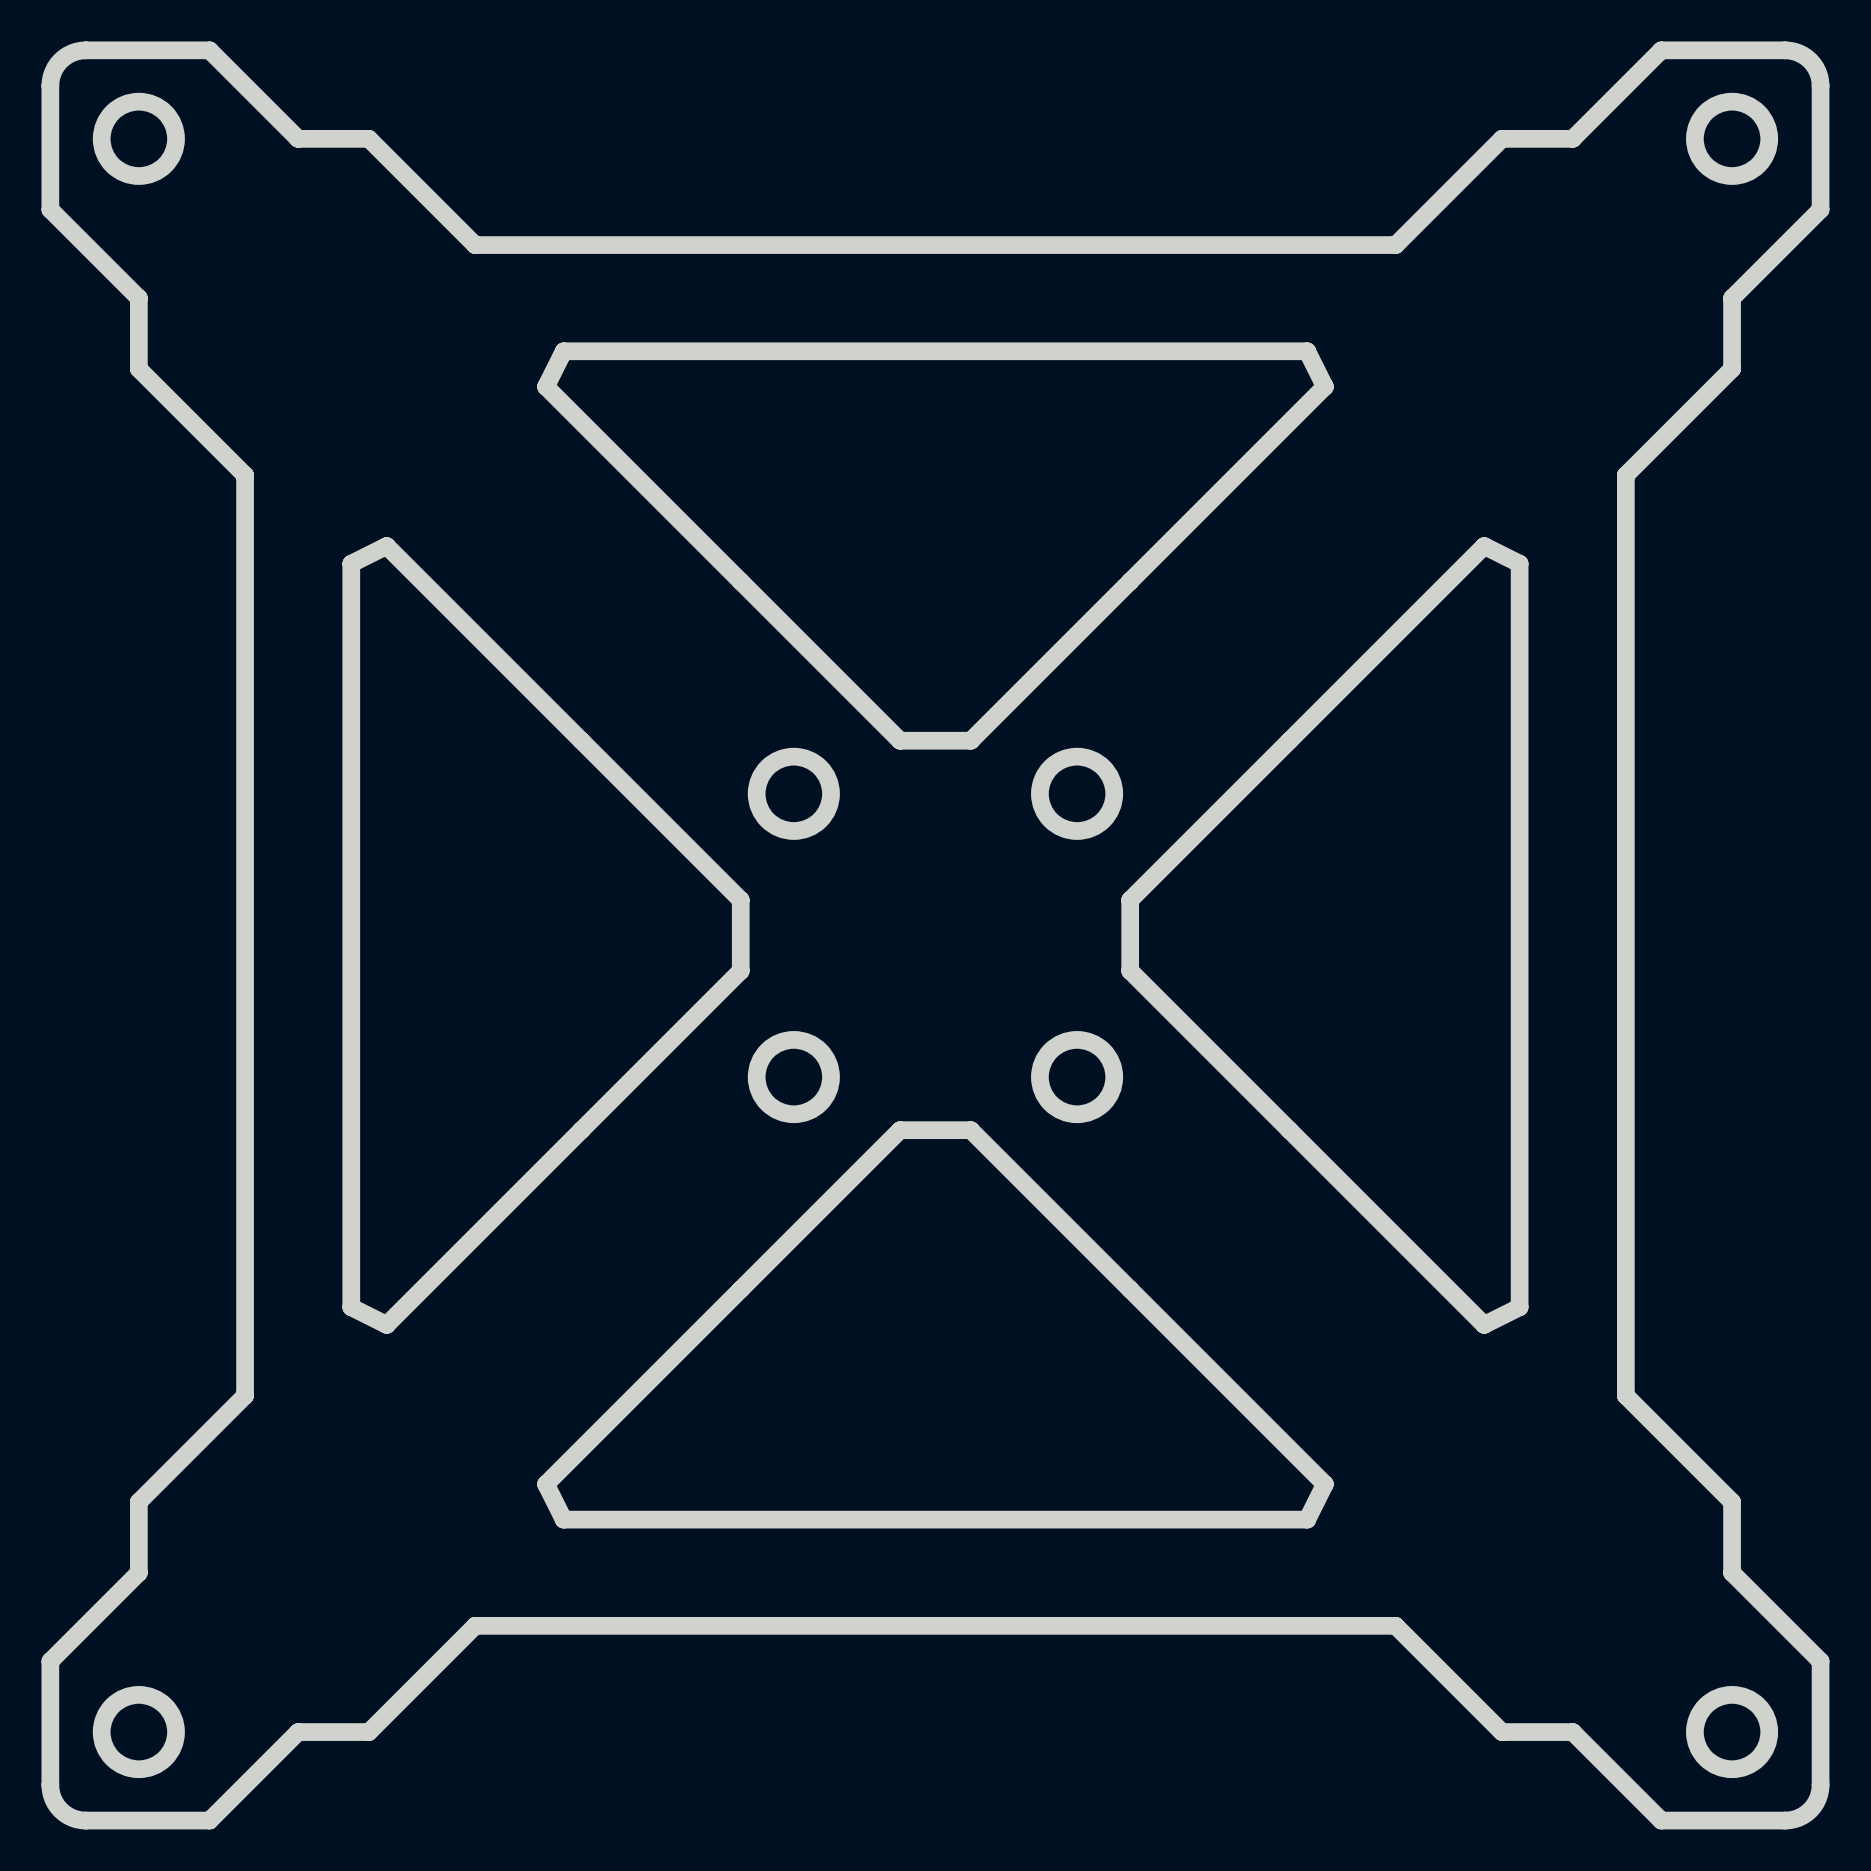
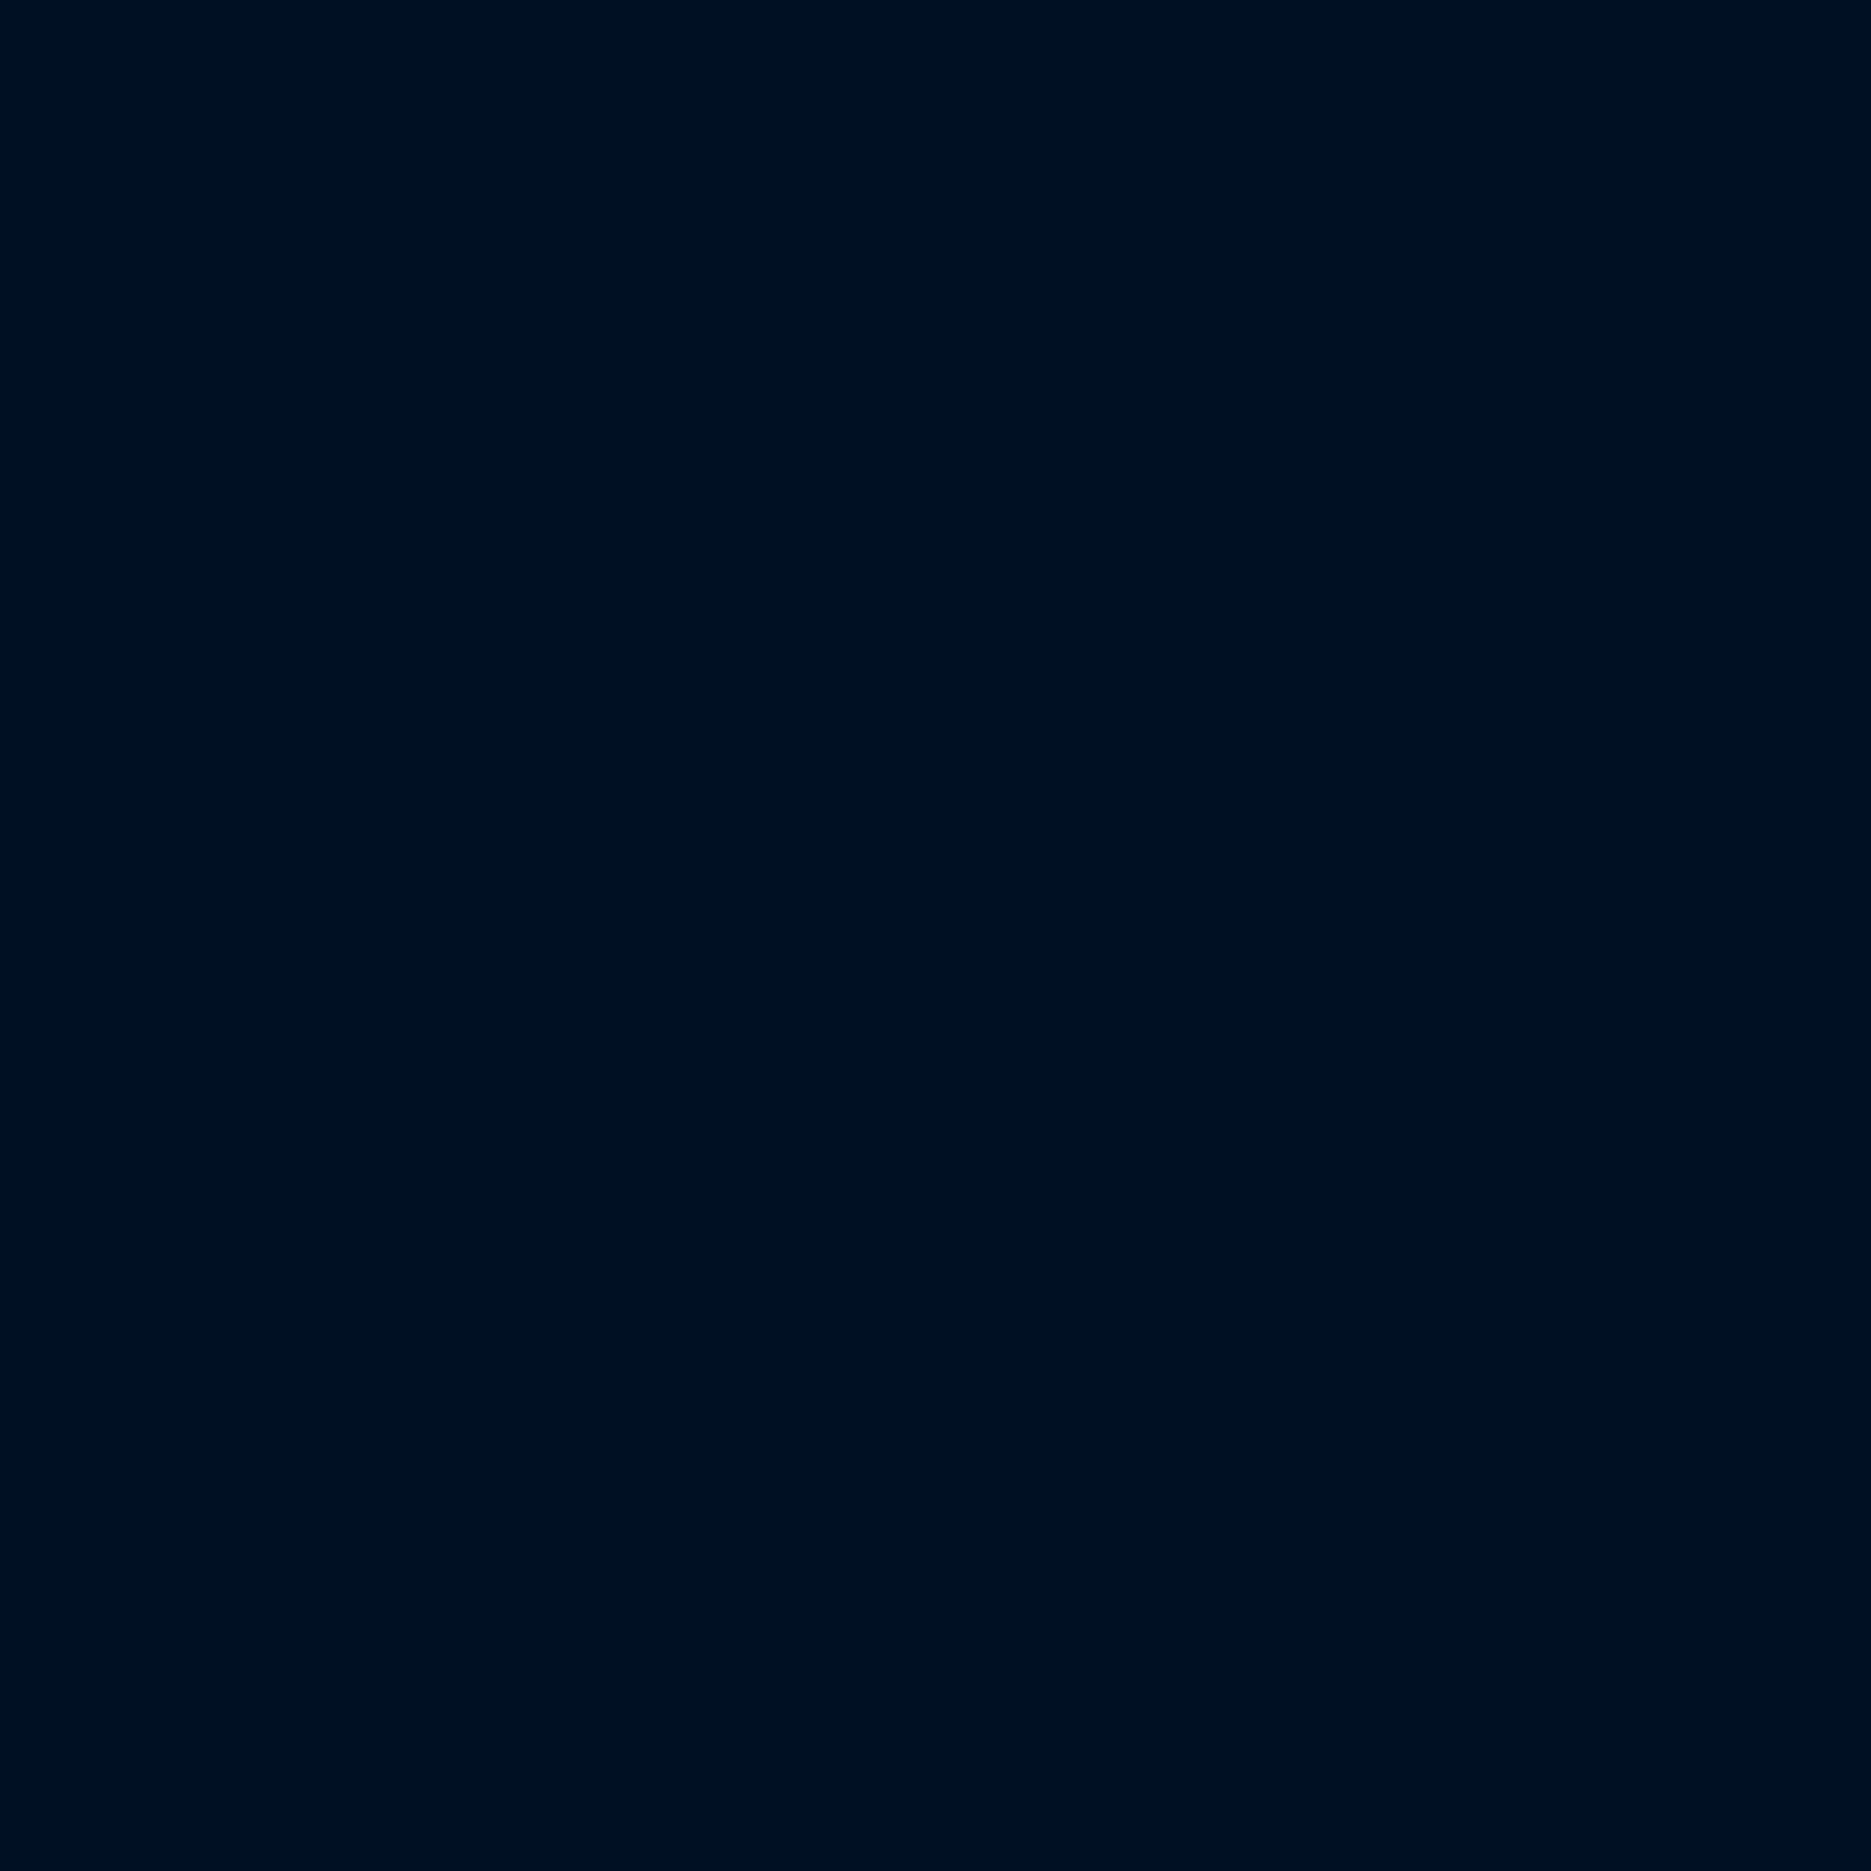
board edge: (1785, 50) (1661, 50) (1572, 138) (1501, 138) (1395, 245) (475, 245) (368, 138) (298, 138) (209, 50) (81, 50) (68, 55) (60, 60) (53, 72) (50, 81) (50, 209) (138, 298) (138, 368) (245, 475) (245, 1395) (138, 1501) (138, 1572) (50, 1661) (50, 1789) (53, 1798) (60, 1810) (72, 1817) (81, 1820) (209, 1820) (298, 1732) (368, 1732) (475, 1625) (1395, 1625) (1501, 1732) (1572, 1732) (1661, 1820) (1789, 1820) (1798, 1817) (1810, 1810) (1815, 1802) (1820, 1789) (1820, 1661) (1732, 1572) (1732, 1501) (1625, 1395) (1625, 475) (1732, 368) (1732, 298) (1820, 209) (1819, 76) (1813, 64) (1806, 57) (1794, 51) (1785, 50) -> none
round board edge: [92, 92, 185, 185] -> none
round board edge: [1686, 92, 1779, 185] -> none
board edge: (1307, 351) (1324, 386) (970, 740) (900, 740) (546, 386) (563, 351) (1307, 351) -> none
board edge: (386, 546) (351, 563) (351, 1307) (386, 1324) (740, 970) (740, 900) (386, 546) -> none
board edge: (1484, 546) (1519, 563) (1519, 1307) (1484, 1324) (1130, 970) (1130, 900) (1484, 546) -> none
round board edge: [747, 747, 840, 840] -> none
round board edge: [1031, 747, 1124, 840] -> none
round board edge: [747, 1031, 840, 1124] -> none
round board edge: [1031, 1031, 1124, 1124] -> none
board edge: (970, 1130) (1324, 1484) (1307, 1519) (563, 1519) (546, 1484) (900, 1130) (970, 1130) -> none
round board edge: [92, 1686, 185, 1779] -> none
round board edge: [1686, 1686, 1779, 1779] -> none

